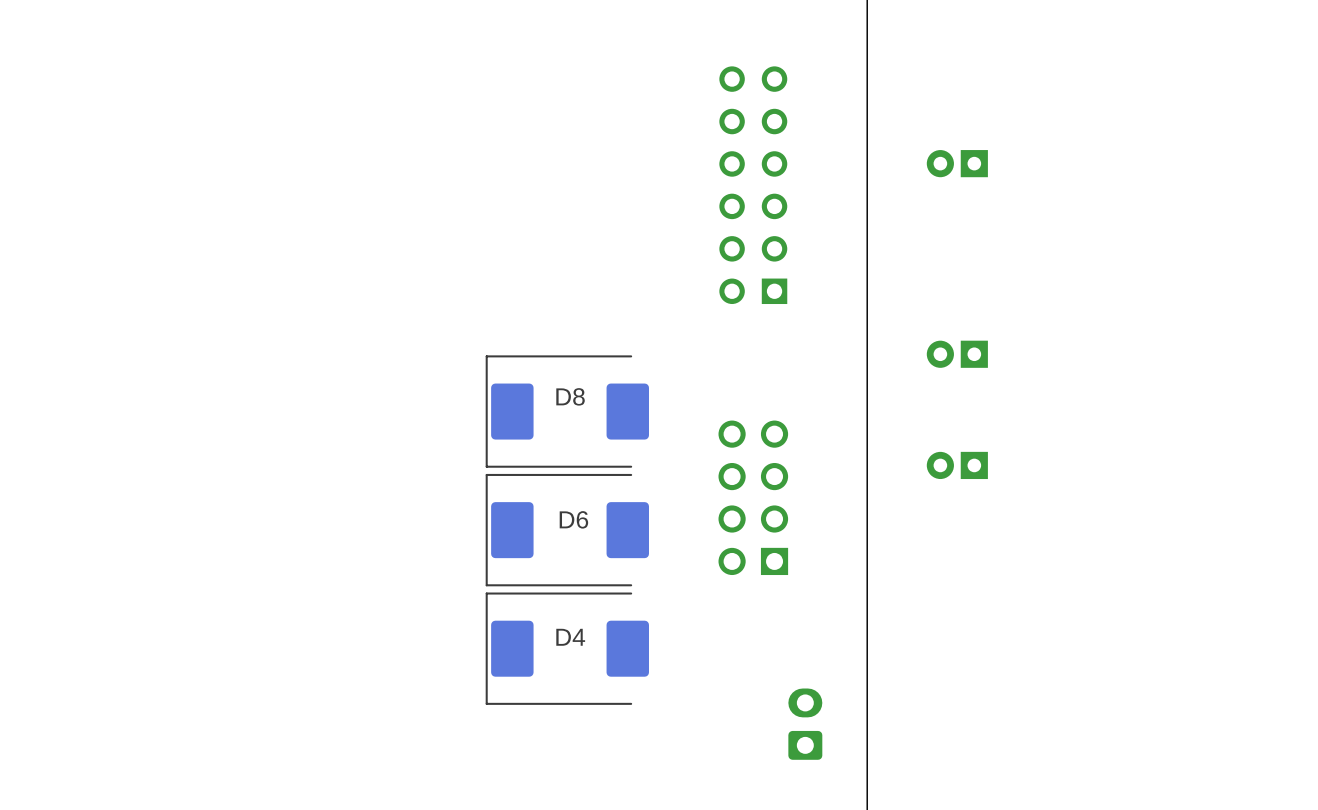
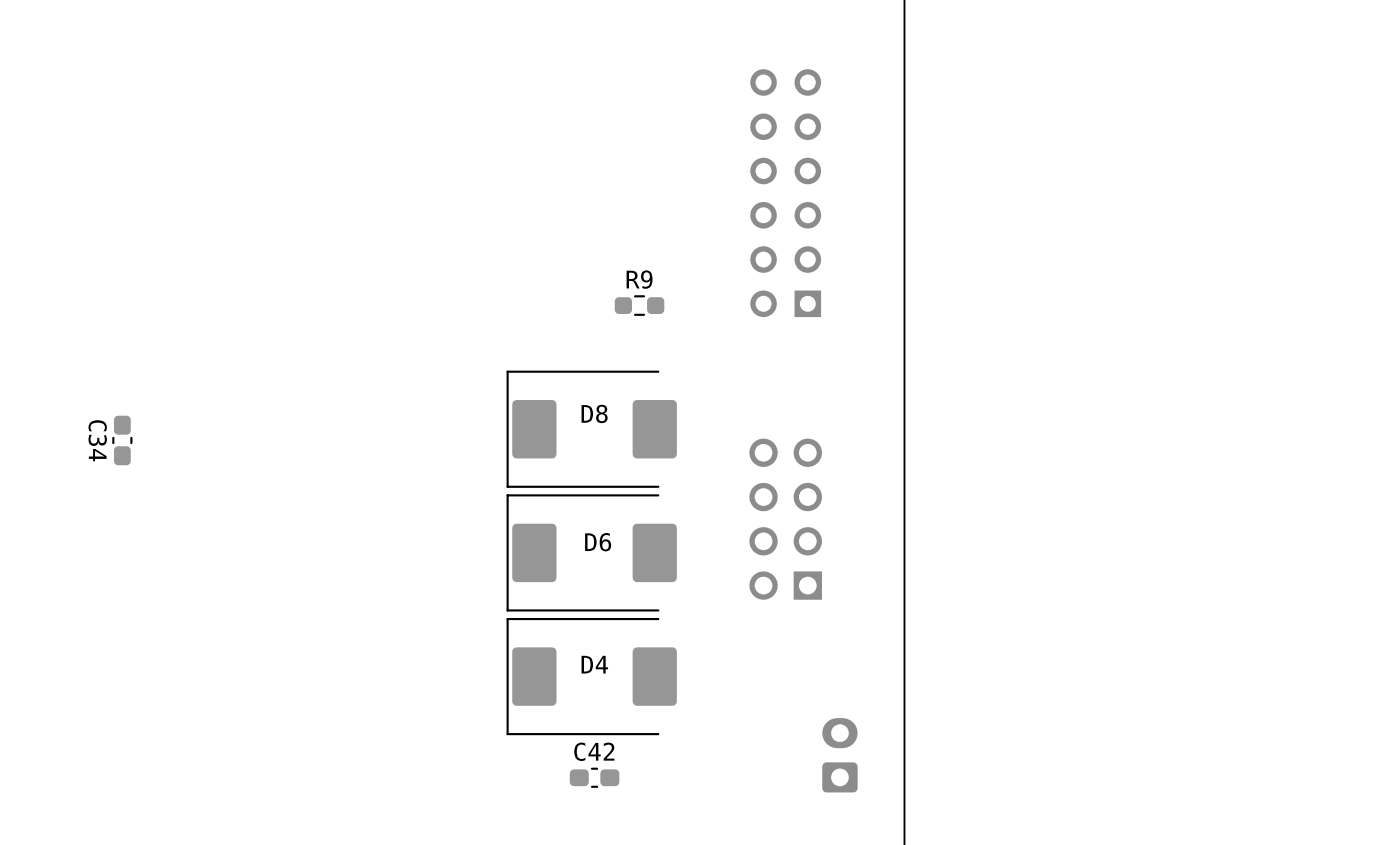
part: (957, 163) -> none
R9: none -> (639, 305)
part: (957, 354) -> none
C34: none -> (122, 440)
part: (957, 465) -> none
C42: none -> (594, 777)

